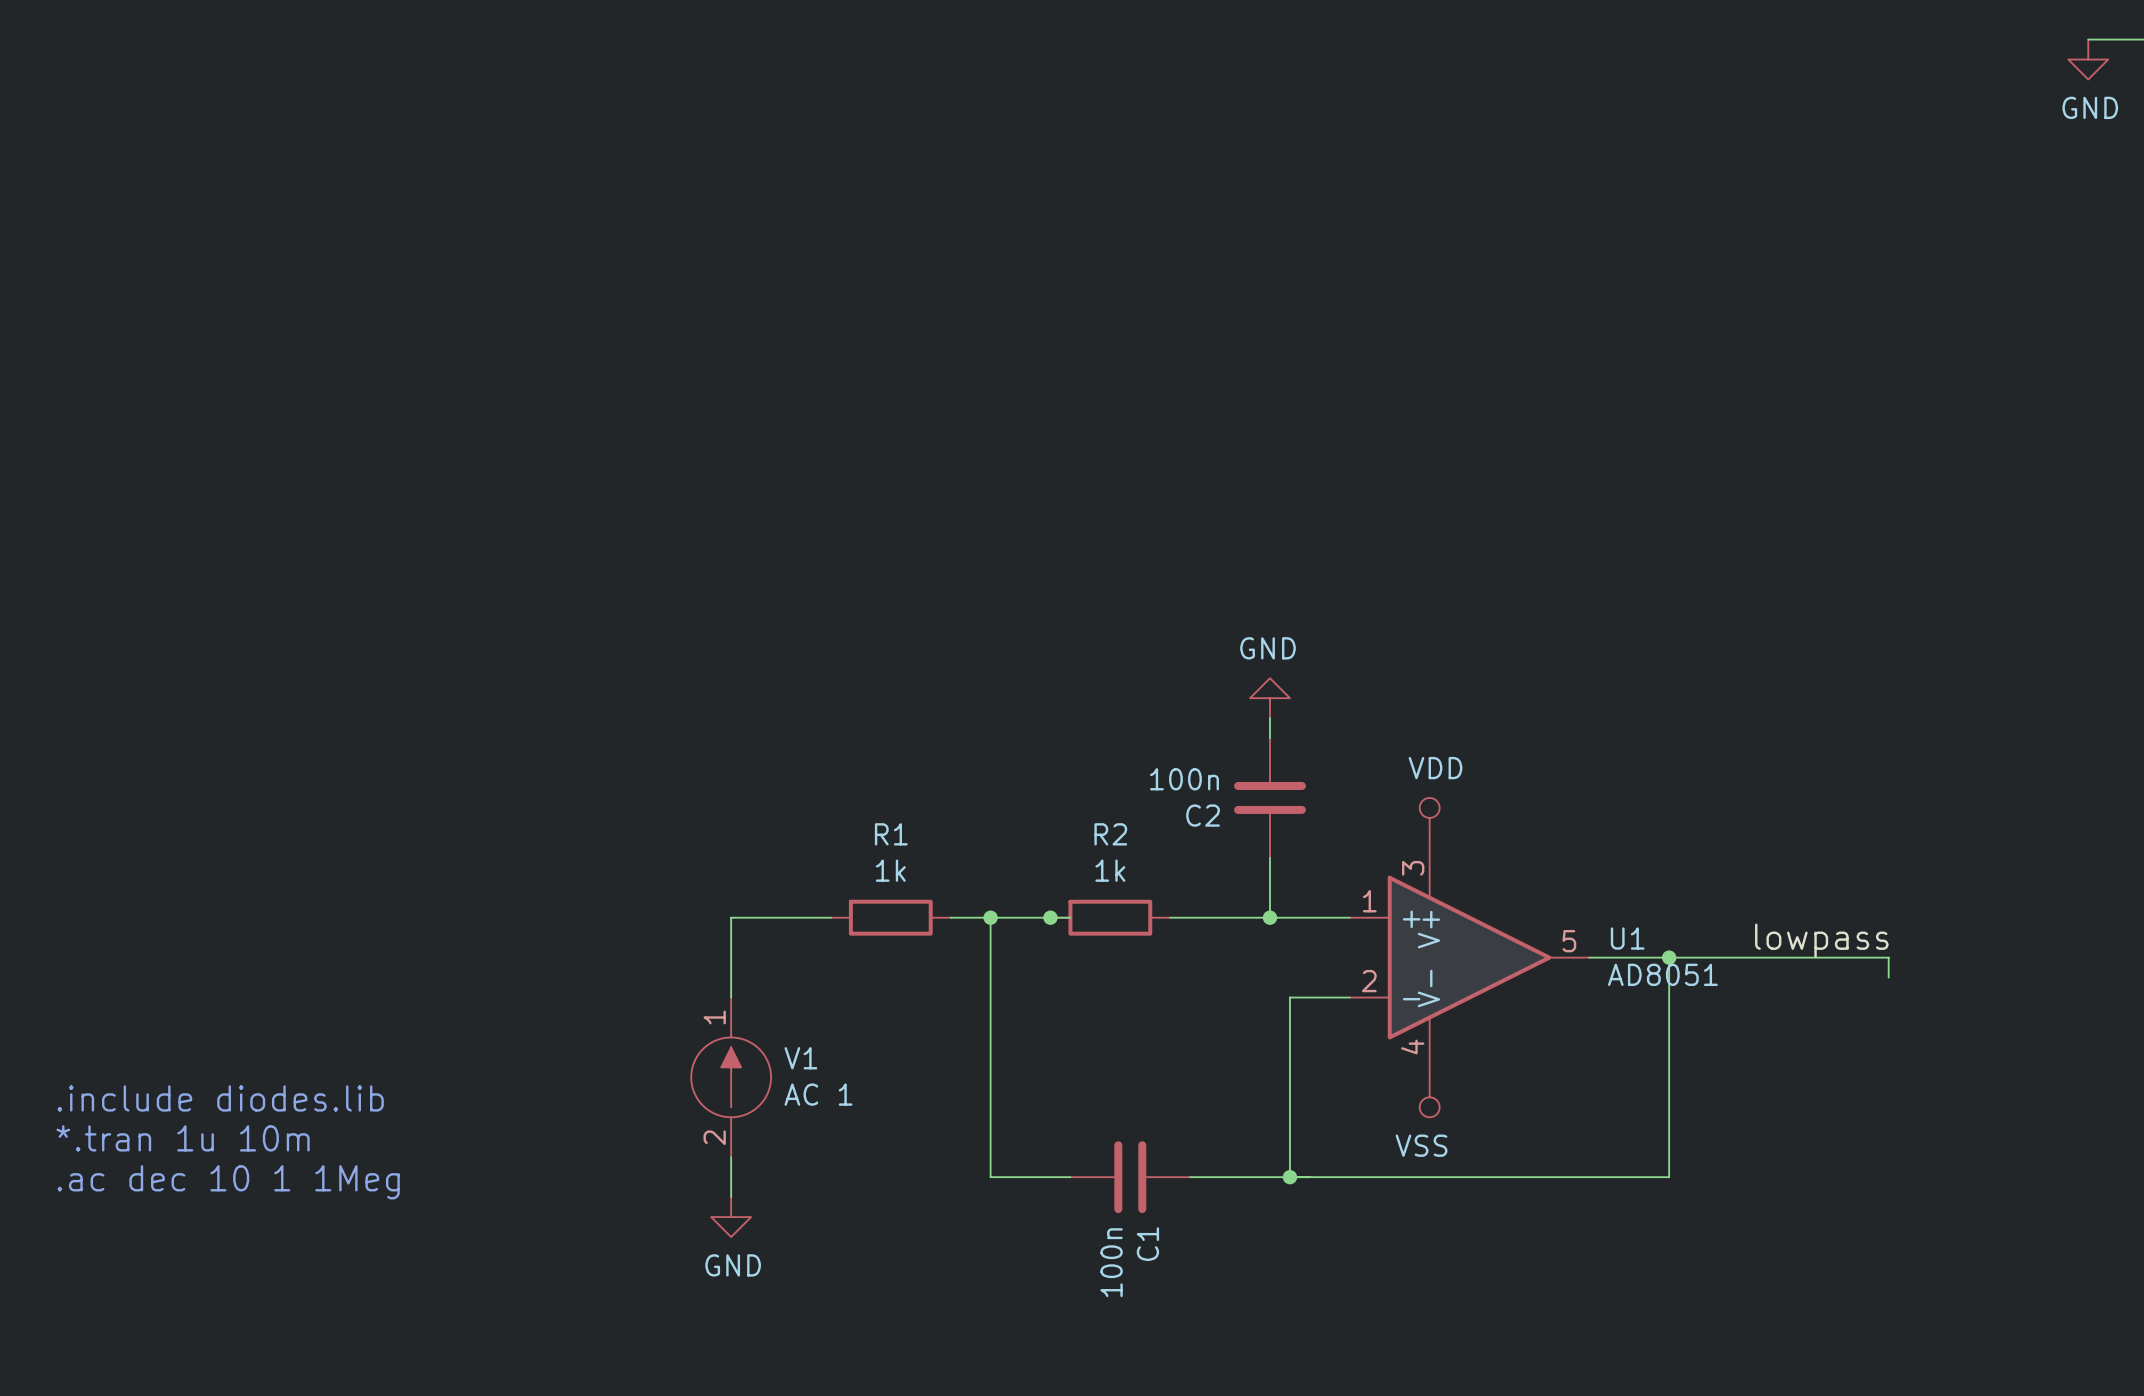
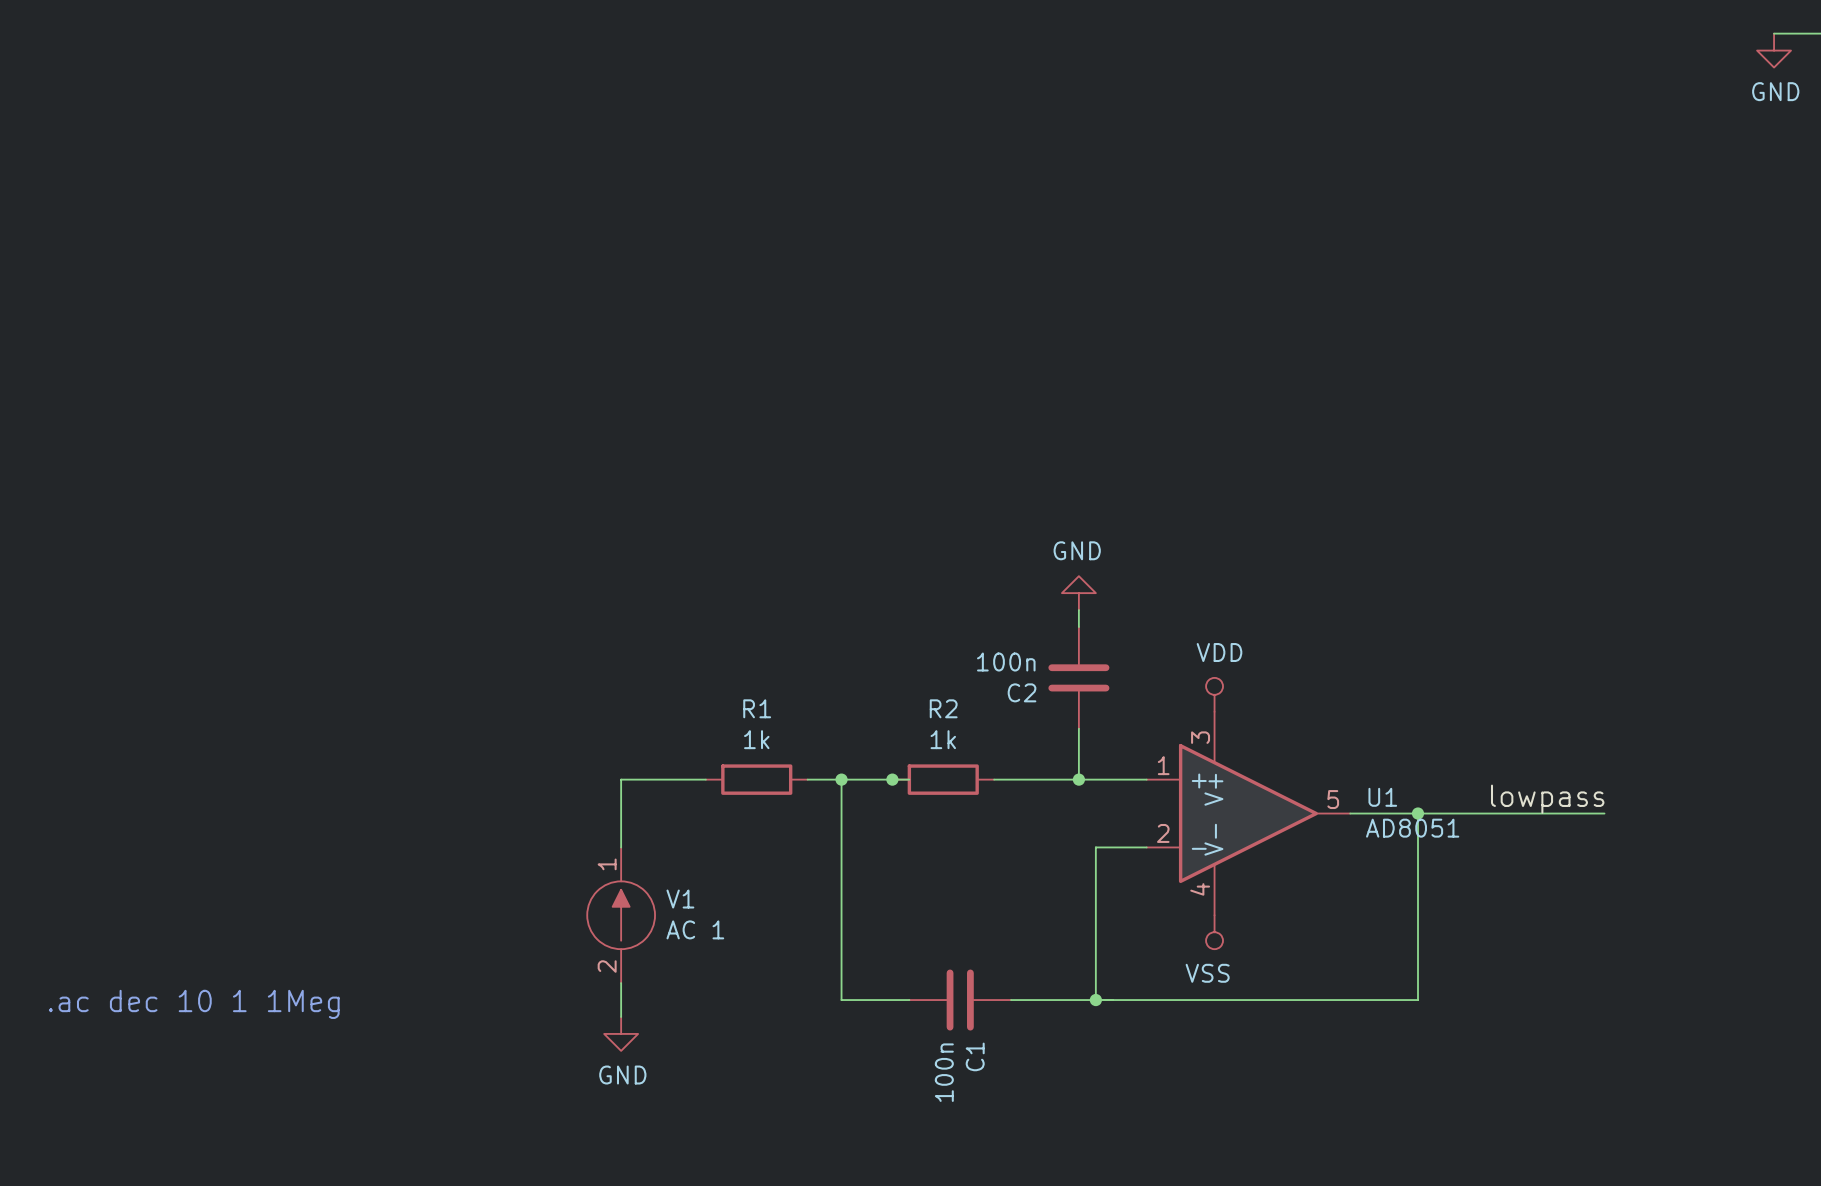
wire: (1888, 957) (1888, 977) -> none
text: .include diodes.lib (220, 1098) -> none
text: *.tran 1u 10m (183, 1138) -> none

